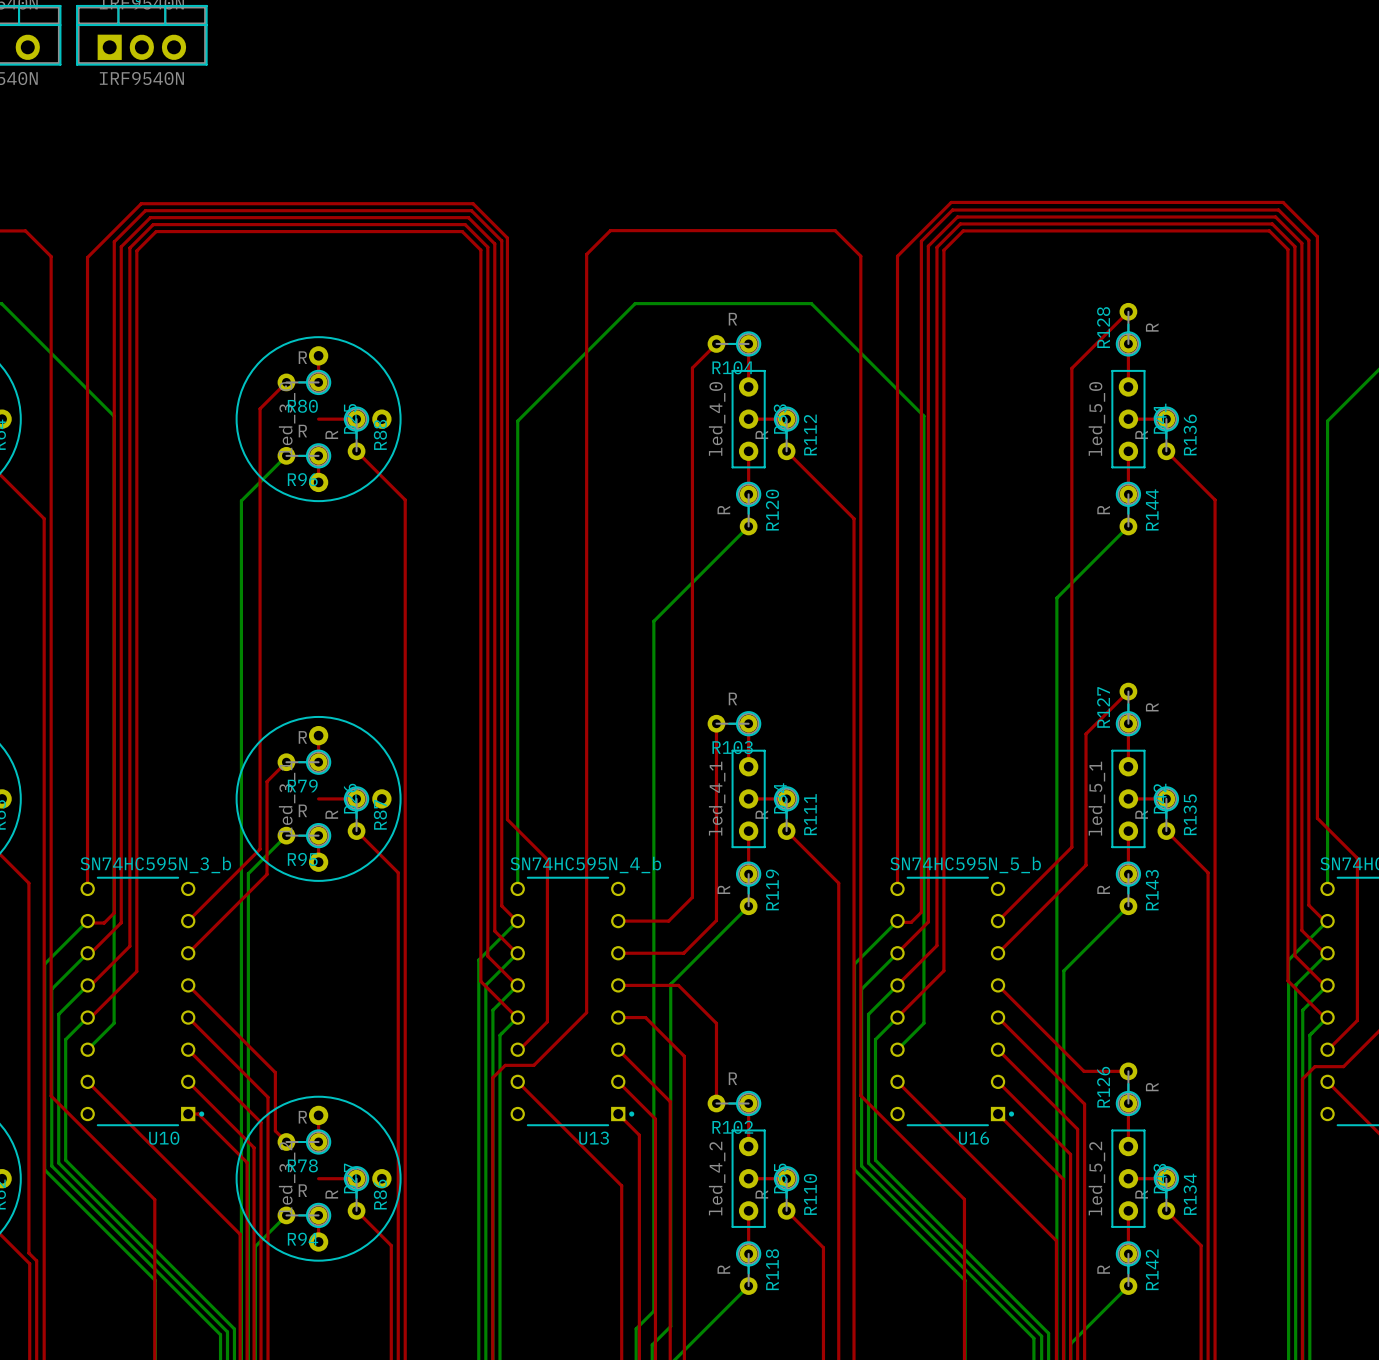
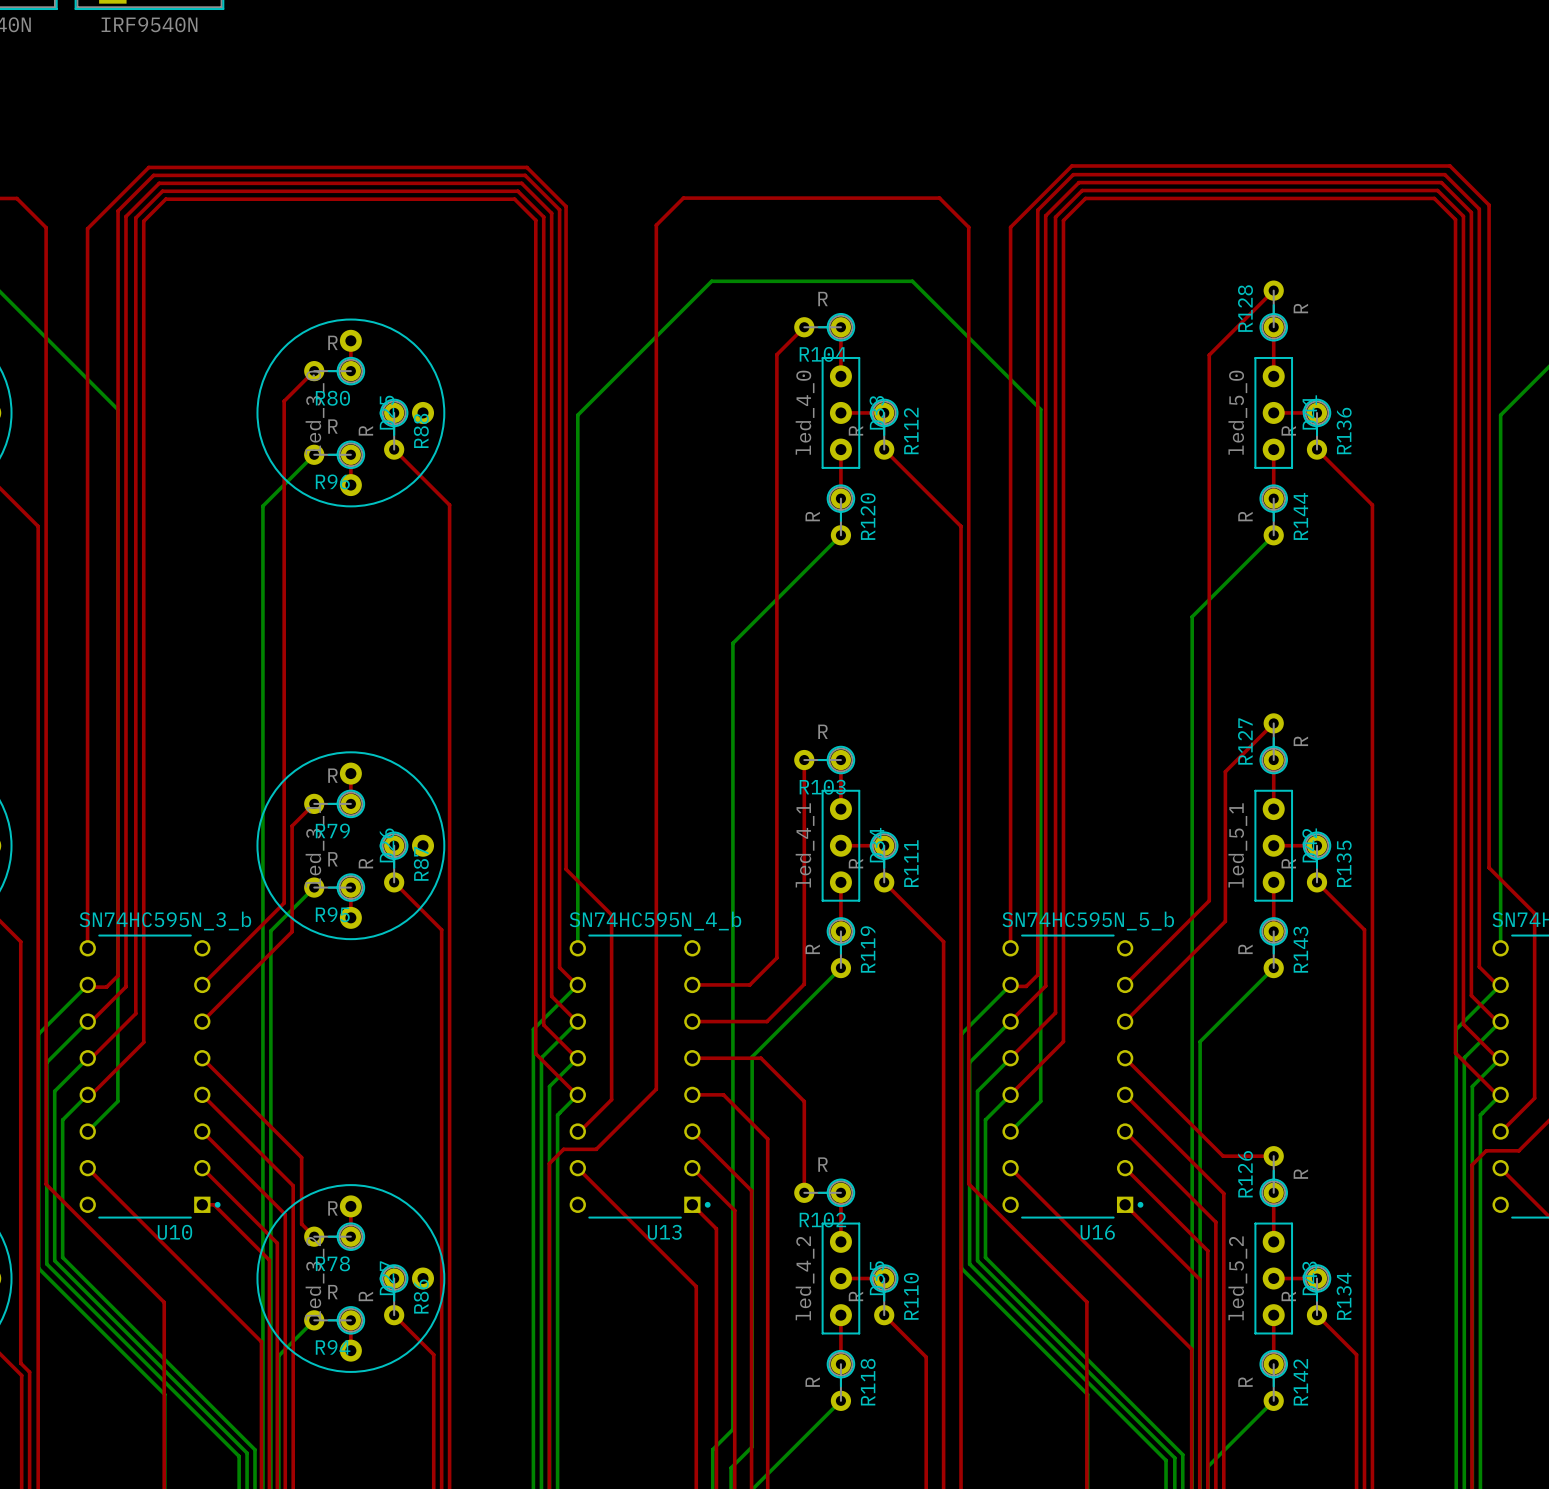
top track: (318, 419) (355, 419) -> none
top track: (318, 798) (355, 798) -> none
top track: (318, 1178) (355, 1178) -> none

